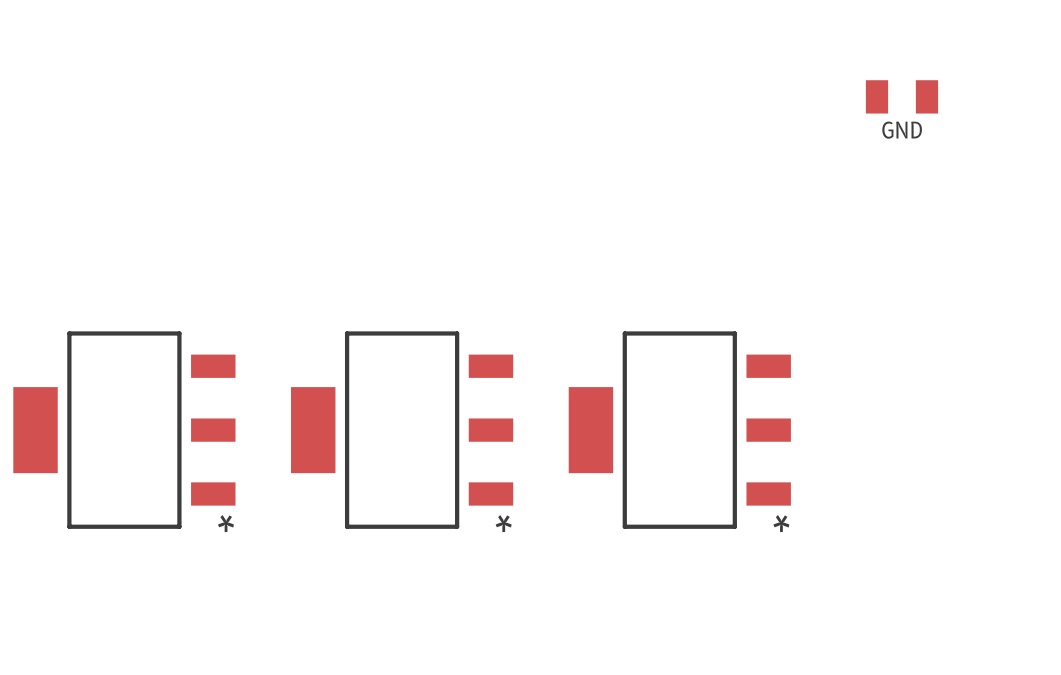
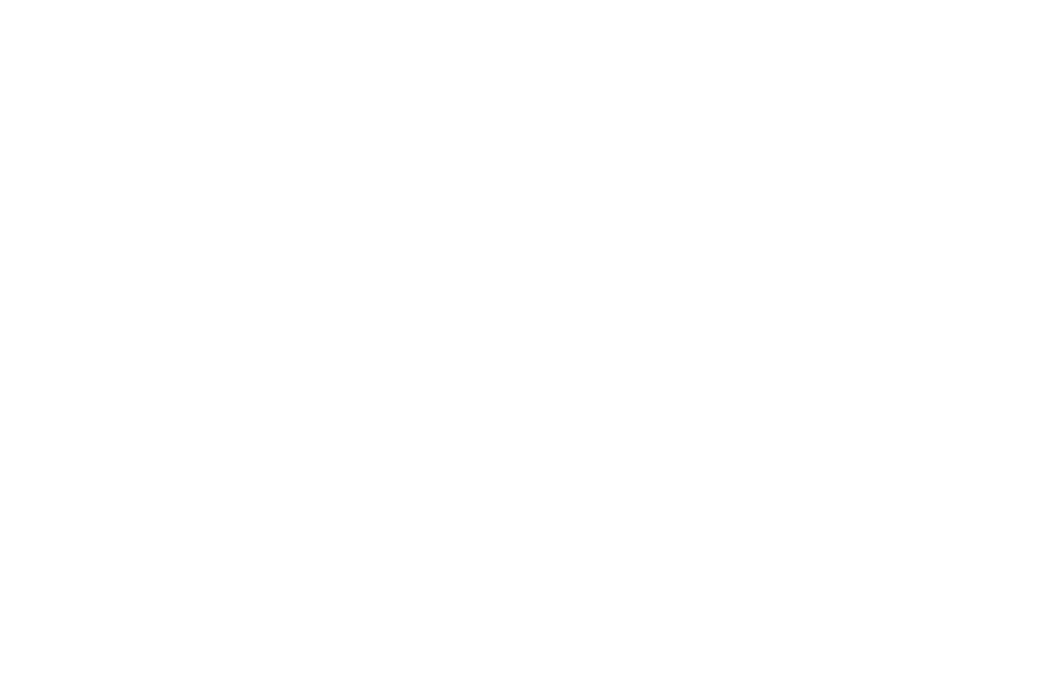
GND: (901, 96) -> none
part: (124, 430) -> none
part: (402, 430) -> none
part: (679, 430) -> none

